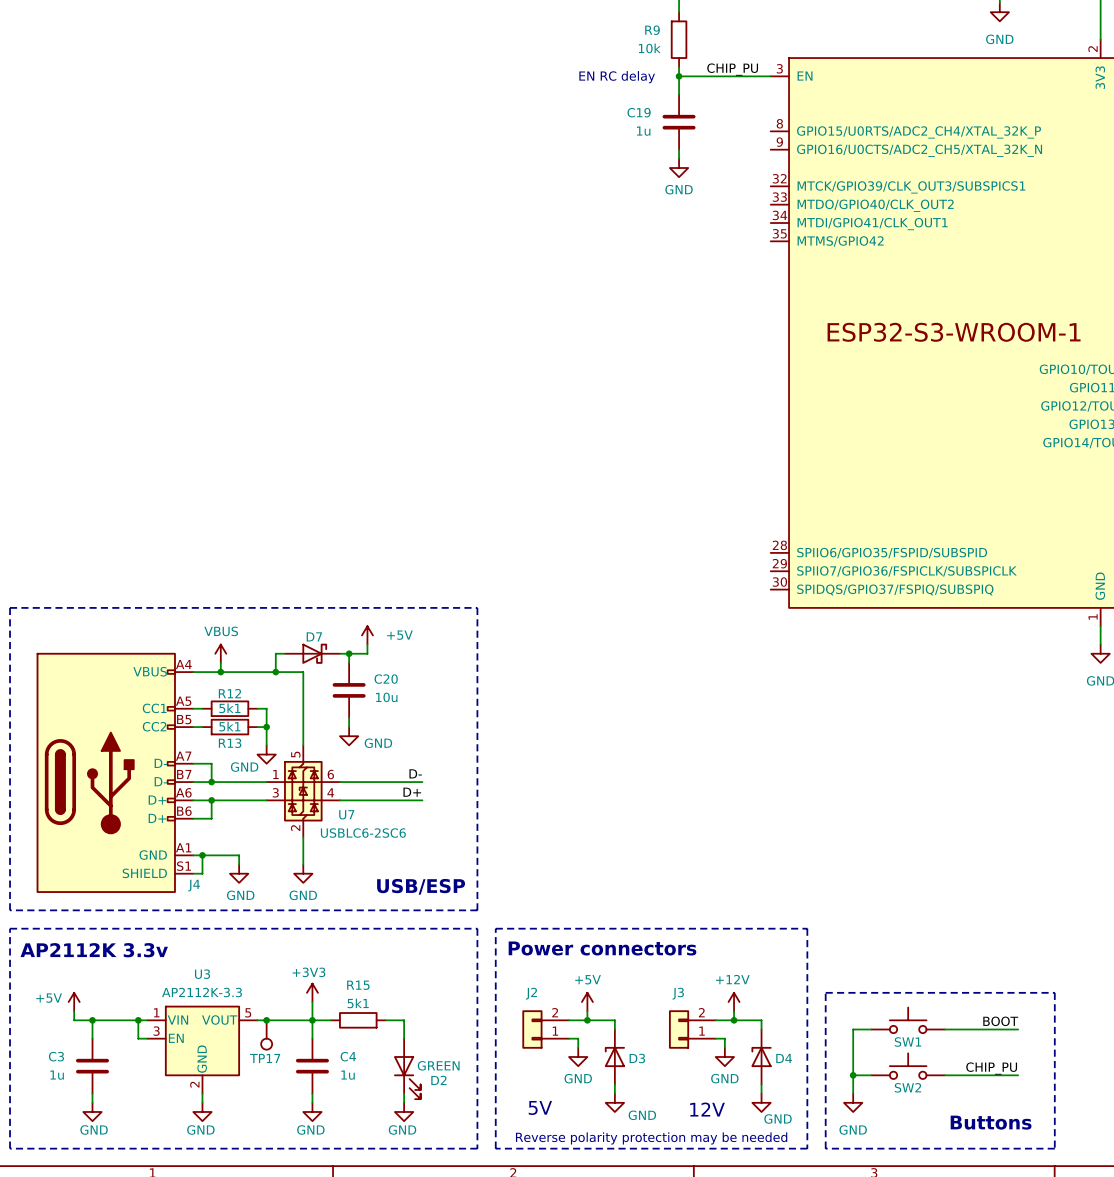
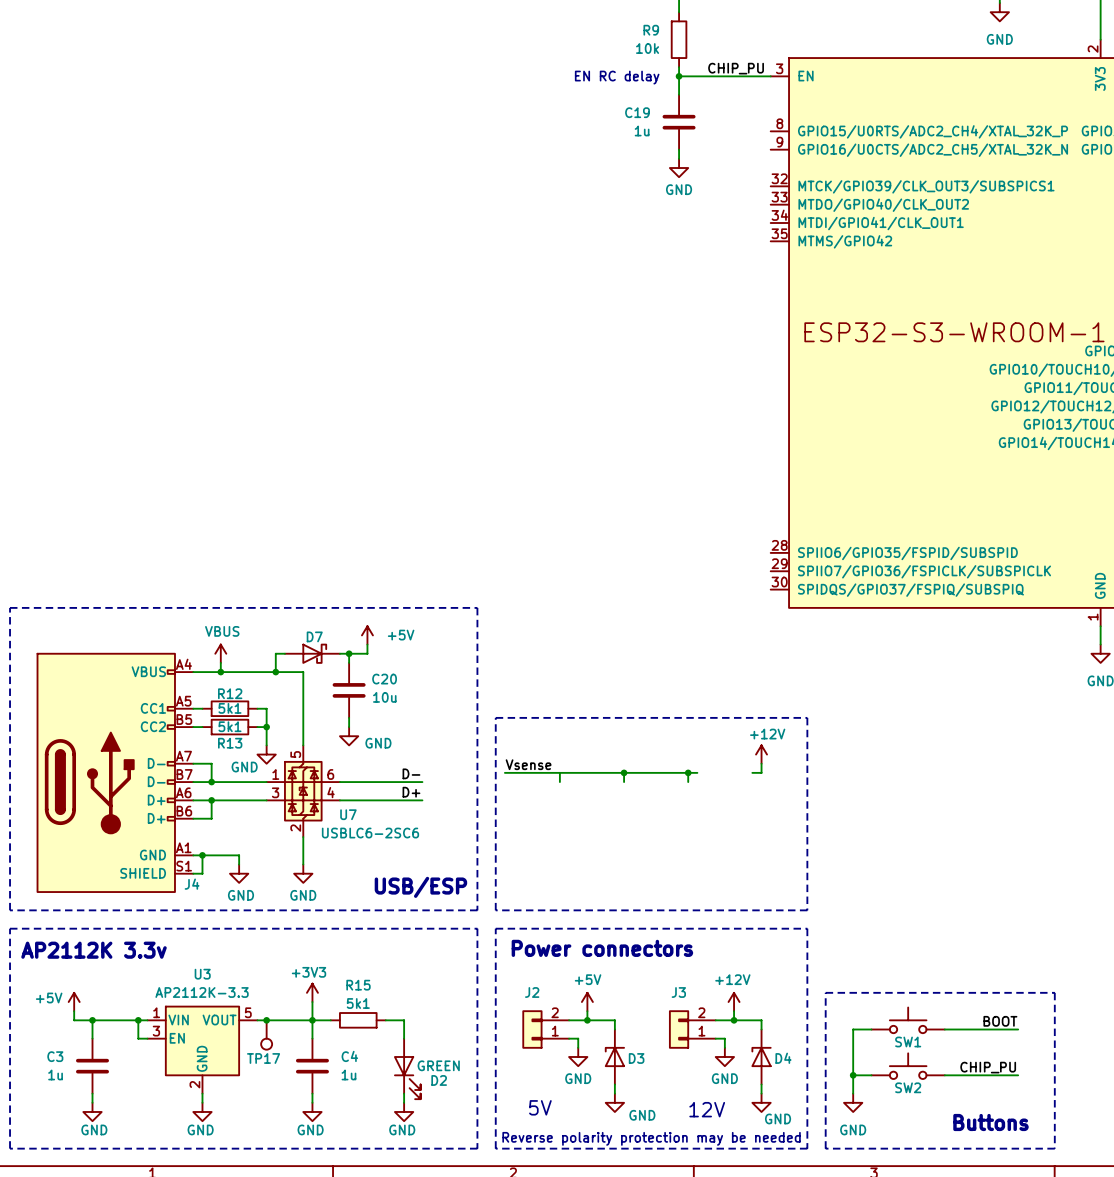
line: none -> (495, 717) (807, 717) (807, 910) (495, 910) (495, 717)
power symbol: none -> +12V (761, 754)
wire: none -> (761, 763) (761, 772) (752, 772)
label: none -> Vsense (528, 764)
wire: none -> (504, 772) (697, 772)
wire: none -> (559, 772) (559, 782)
wire: none -> (624, 772) (624, 782)
junction: none -> (624, 772)
wire: none -> (688, 772) (688, 782)
junction: none -> (688, 772)

